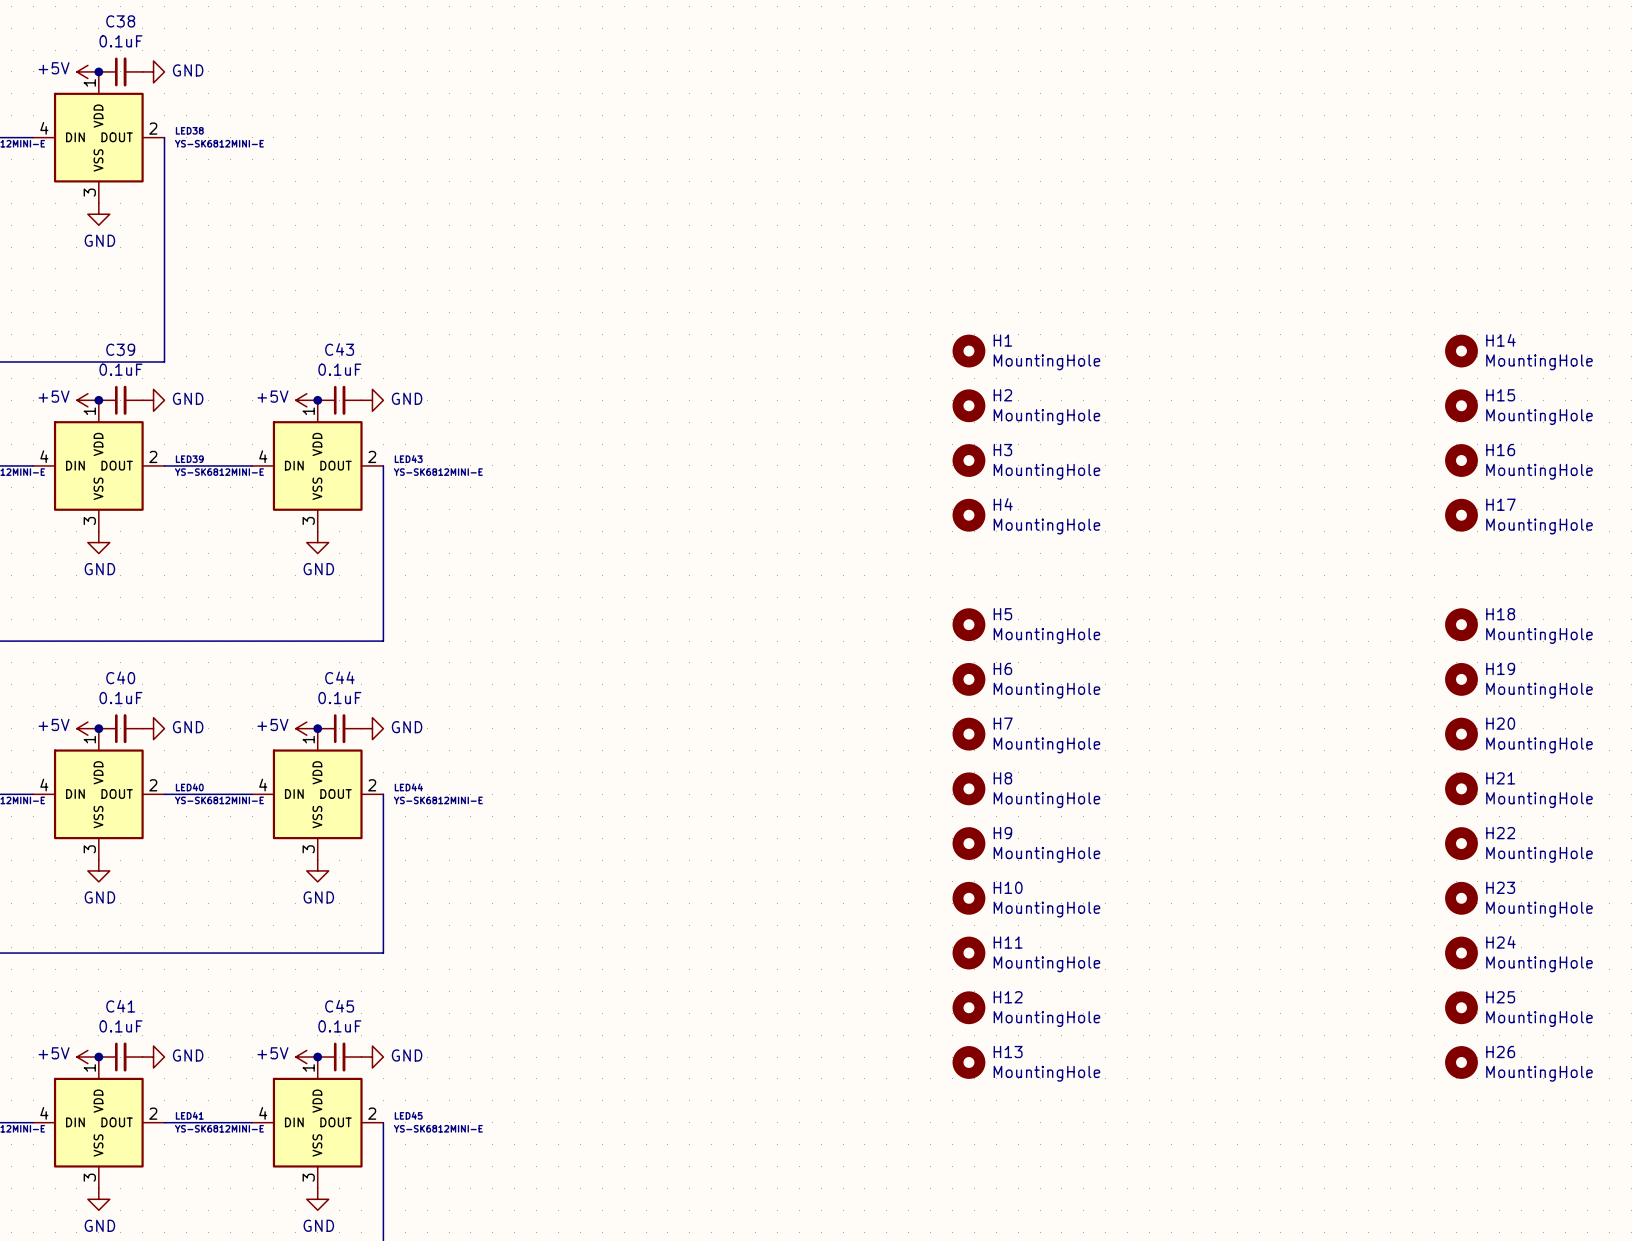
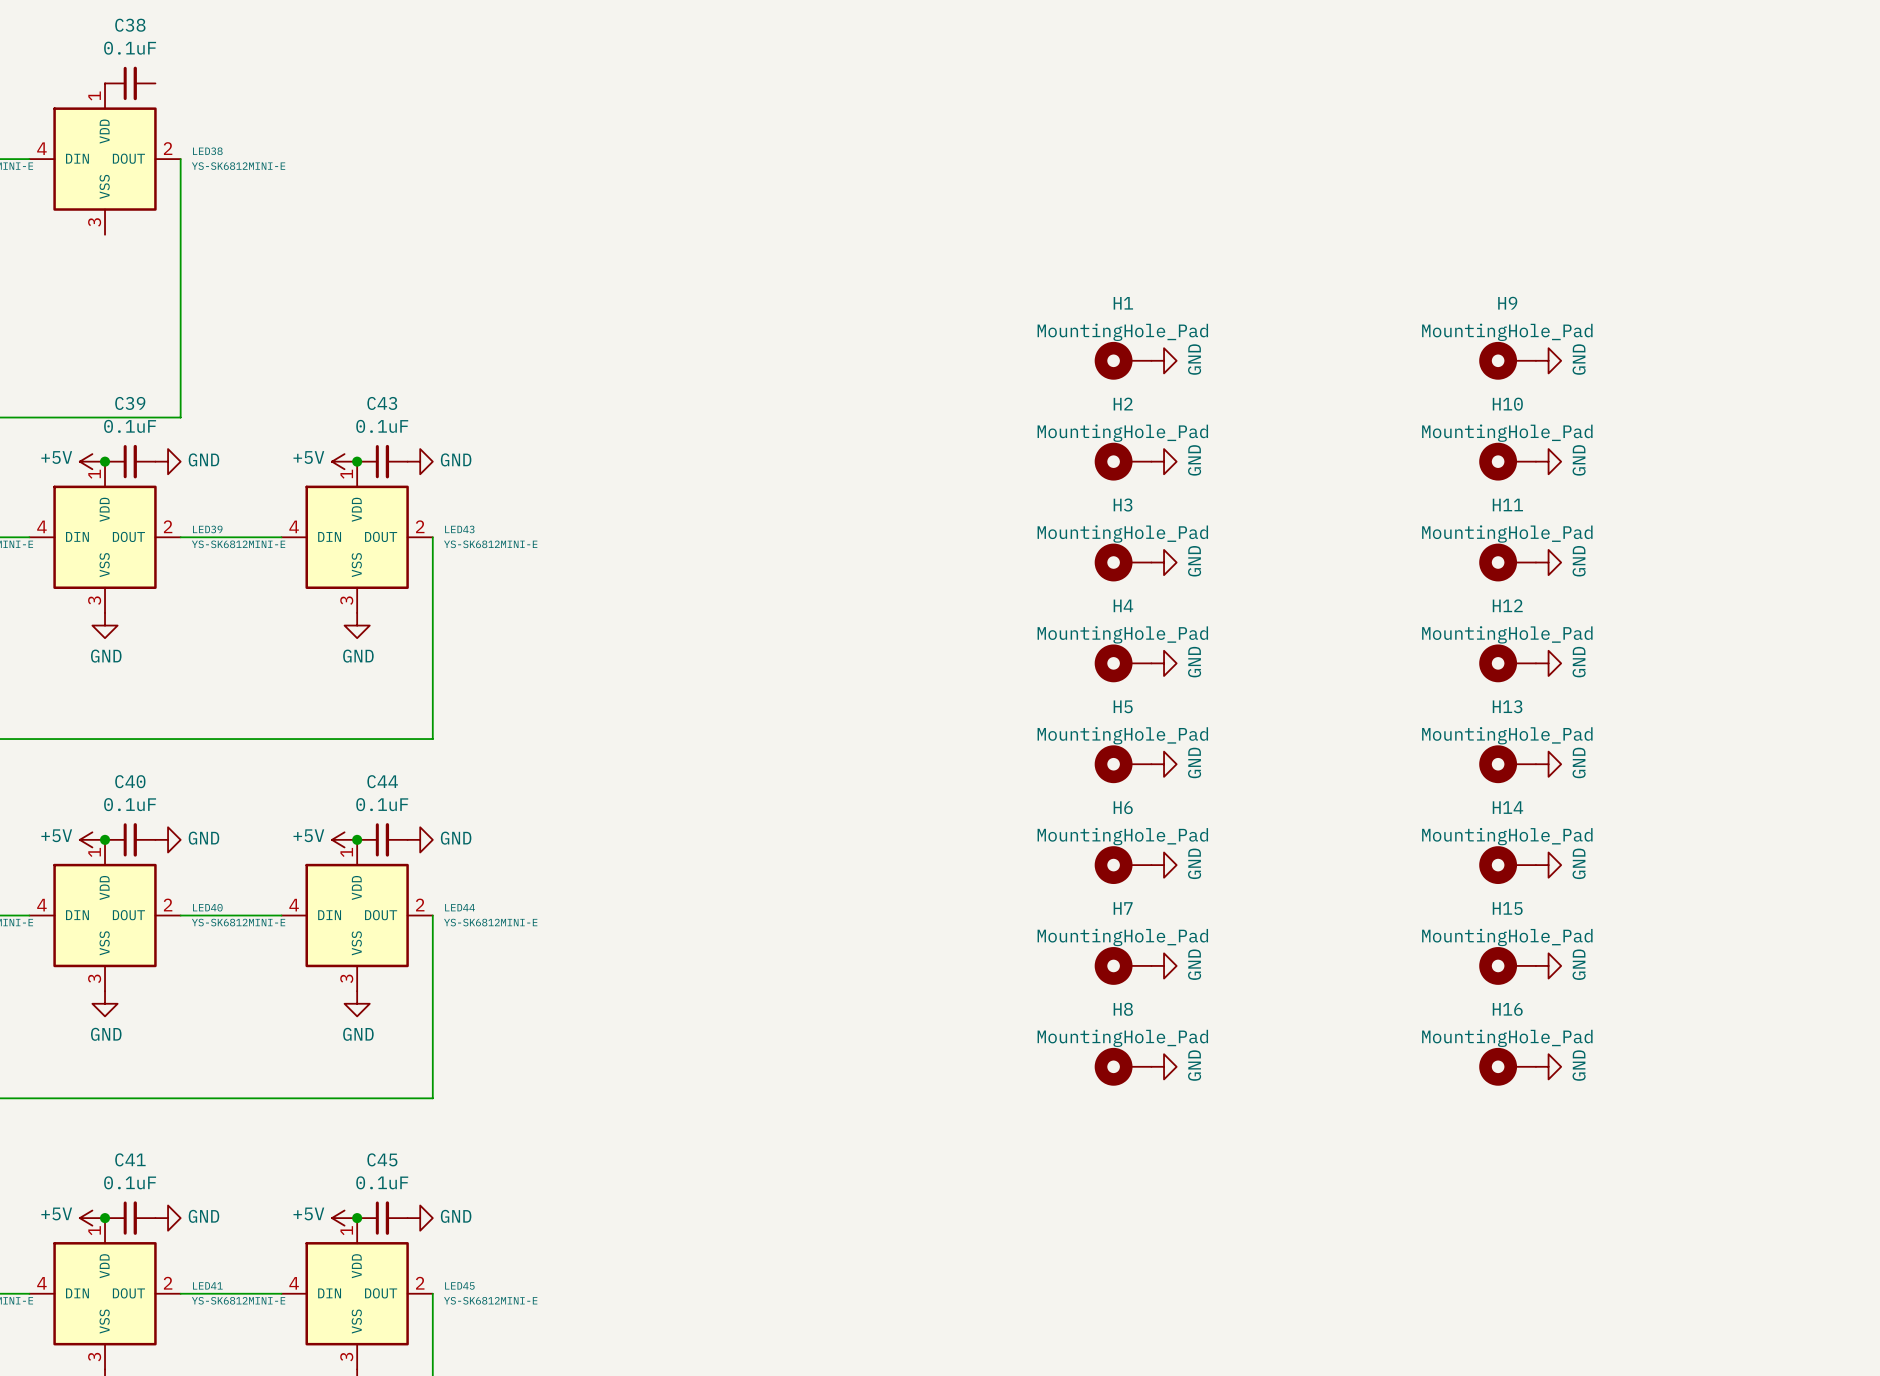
power symbol: +5V (87, 71) -> none
junction: (98, 71) -> none
power symbol: GND (153, 71) -> none
power symbol: GND (98, 214) -> none
power symbol: none -> GND (1164, 360)
power symbol: none -> GND (1548, 360)
H1 symbol: [952, 334, 986, 368] -> [1094, 341, 1152, 380]
H14 symbol: [1445, 334, 1478, 368] -> [1479, 846, 1536, 885]
H1 name position: H1 (1002, 340) -> H1 (1123, 303)
H14 name position: H14 (1500, 340) -> H14 (1507, 807)
H1 value: MountingHole (1046, 362) -> MountingHole_Pad (1122, 332)
H14 value: MountingHole (1539, 362) -> MountingHole_Pad (1507, 836)
H2 symbol: [952, 389, 986, 423] -> [1094, 442, 1152, 481]
H15 symbol: [1445, 389, 1478, 423] -> [1479, 947, 1536, 985]
H2 name position: H2 (1002, 395) -> H2 (1123, 404)
H15 name position: H15 (1500, 395) -> H15 (1507, 908)
power symbol: none -> GND (1164, 461)
power symbol: none -> GND (1548, 461)
H2 value: MountingHole (1046, 417) -> MountingHole_Pad (1122, 433)
H15 value: MountingHole (1539, 417) -> MountingHole_Pad (1507, 937)
H3 symbol: [952, 444, 986, 477] -> [1094, 543, 1152, 582]
H16 symbol: [1445, 444, 1478, 477] -> [1479, 1047, 1536, 1086]
H3 name position: H3 (1002, 450) -> H3 (1123, 505)
H16 name position: H16 (1500, 450) -> H16 (1507, 1009)
H3 value: MountingHole (1046, 471) -> MountingHole_Pad (1122, 534)
H16 value: MountingHole (1539, 471) -> MountingHole_Pad (1507, 1038)
power symbol: none -> GND (1164, 562)
power symbol: none -> GND (1548, 562)
H4 symbol: [952, 498, 986, 532] -> [1094, 644, 1152, 683]
H4 name position: H4 (1003, 504) -> H4 (1123, 605)
H17: MountingHole (1461, 515) -> none
H4 value: MountingHole (1046, 526) -> MountingHole_Pad (1122, 634)
power symbol: none -> GND (1164, 663)
power symbol: none -> GND (1548, 663)
H5 symbol: [952, 608, 986, 642] -> [1094, 745, 1152, 784]
H5 name position: H5 (1002, 614) -> H5 (1123, 706)
H18: MountingHole (1461, 624) -> none
H5 value: MountingHole (1046, 635) -> MountingHole_Pad (1122, 735)
H6 symbol: [952, 662, 986, 696] -> [1094, 846, 1152, 885]
power symbol: none -> GND (1164, 764)
power symbol: none -> GND (1548, 764)
H6 name position: H6 (1002, 668) -> H6 (1123, 807)
H19: MountingHole (1461, 679) -> none
H6 value: MountingHole (1046, 690) -> MountingHole_Pad (1122, 836)
H7 symbol: [952, 717, 986, 751] -> [1094, 947, 1152, 985]
H7 name position: H7 (1003, 723) -> H7 (1123, 908)
H20: MountingHole (1461, 734) -> none
H7 value: MountingHole (1046, 745) -> MountingHole_Pad (1122, 937)
power symbol: none -> GND (1164, 865)
power symbol: none -> GND (1548, 865)
H8 symbol: [952, 772, 986, 806] -> [1094, 1047, 1152, 1086]
H8 name position: H8 (1002, 778) -> H8 (1123, 1009)
H21: MountingHole (1461, 788) -> none
H8 value: MountingHole (1046, 800) -> MountingHole_Pad (1122, 1038)
H9 symbol: [952, 827, 986, 861] -> [1479, 341, 1536, 380]
H9 name position: H9 (1002, 833) -> H9 (1507, 303)
power symbol: none -> GND (1164, 965)
power symbol: none -> GND (1548, 965)
H22: MountingHole (1461, 843) -> none
H9 value: MountingHole (1046, 854) -> MountingHole_Pad (1507, 332)
H10 symbol: [952, 881, 986, 915] -> [1479, 442, 1536, 481]
H10 name position: H10 (1008, 887) -> H10 (1507, 404)
H23: MountingHole (1461, 898) -> none
H10 value: MountingHole (1046, 909) -> MountingHole_Pad (1507, 433)
power symbol: none -> GND (1164, 1066)
power symbol: none -> GND (1548, 1066)
H11 symbol: [952, 936, 986, 970] -> [1479, 543, 1536, 582]
H11 name position: H11 (1008, 942) -> H11 (1507, 505)
H24: MountingHole (1461, 953) -> none
H11 value: MountingHole (1046, 964) -> MountingHole_Pad (1507, 534)
H12 symbol: [952, 991, 986, 1025] -> [1479, 644, 1536, 683]
H12 name position: H12 (1008, 997) -> H12 (1507, 605)
H25: MountingHole (1461, 1007) -> none
H12 value: MountingHole (1046, 1019) -> MountingHole_Pad (1507, 634)
H13 symbol: [952, 1046, 986, 1079] -> [1479, 745, 1536, 784]
H13 name position: H13 (1008, 1052) -> H13 (1507, 706)
H26: MountingHole (1461, 1062) -> none
H13 value: MountingHole (1046, 1073) -> MountingHole_Pad (1507, 735)

